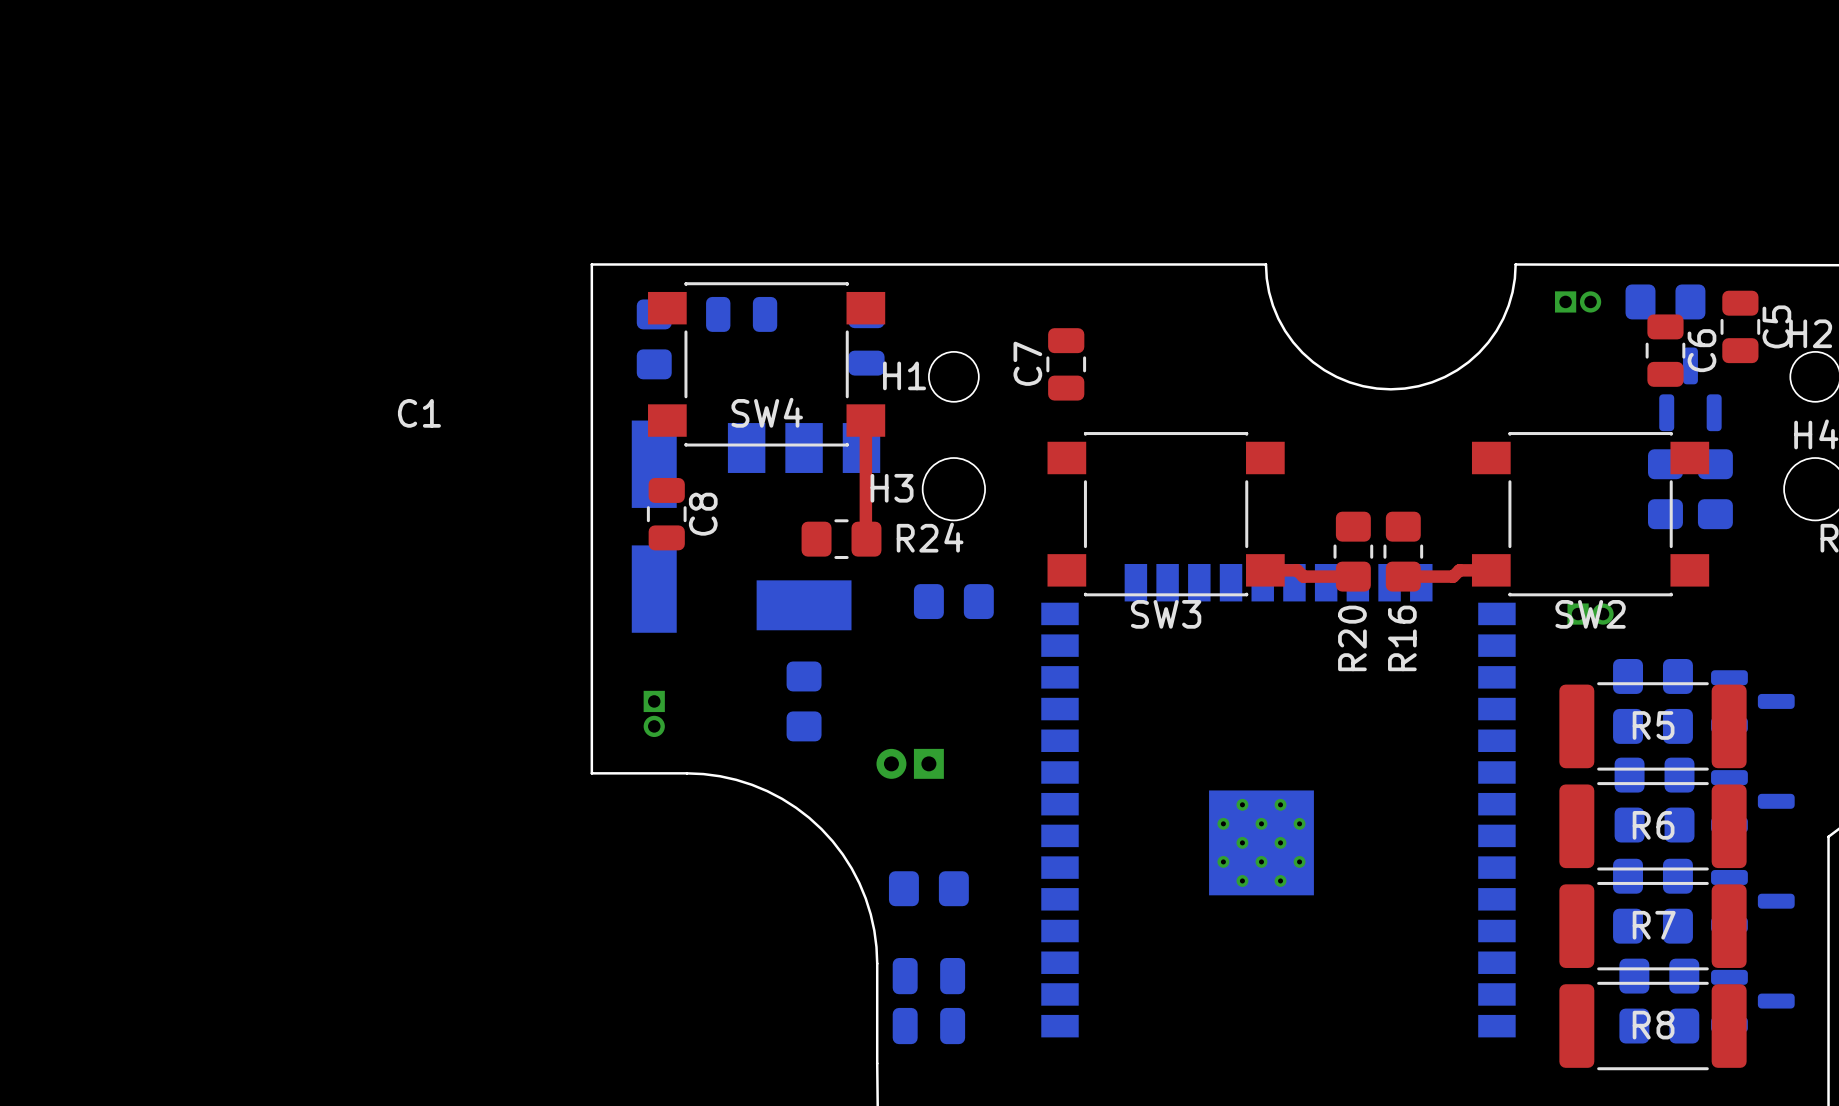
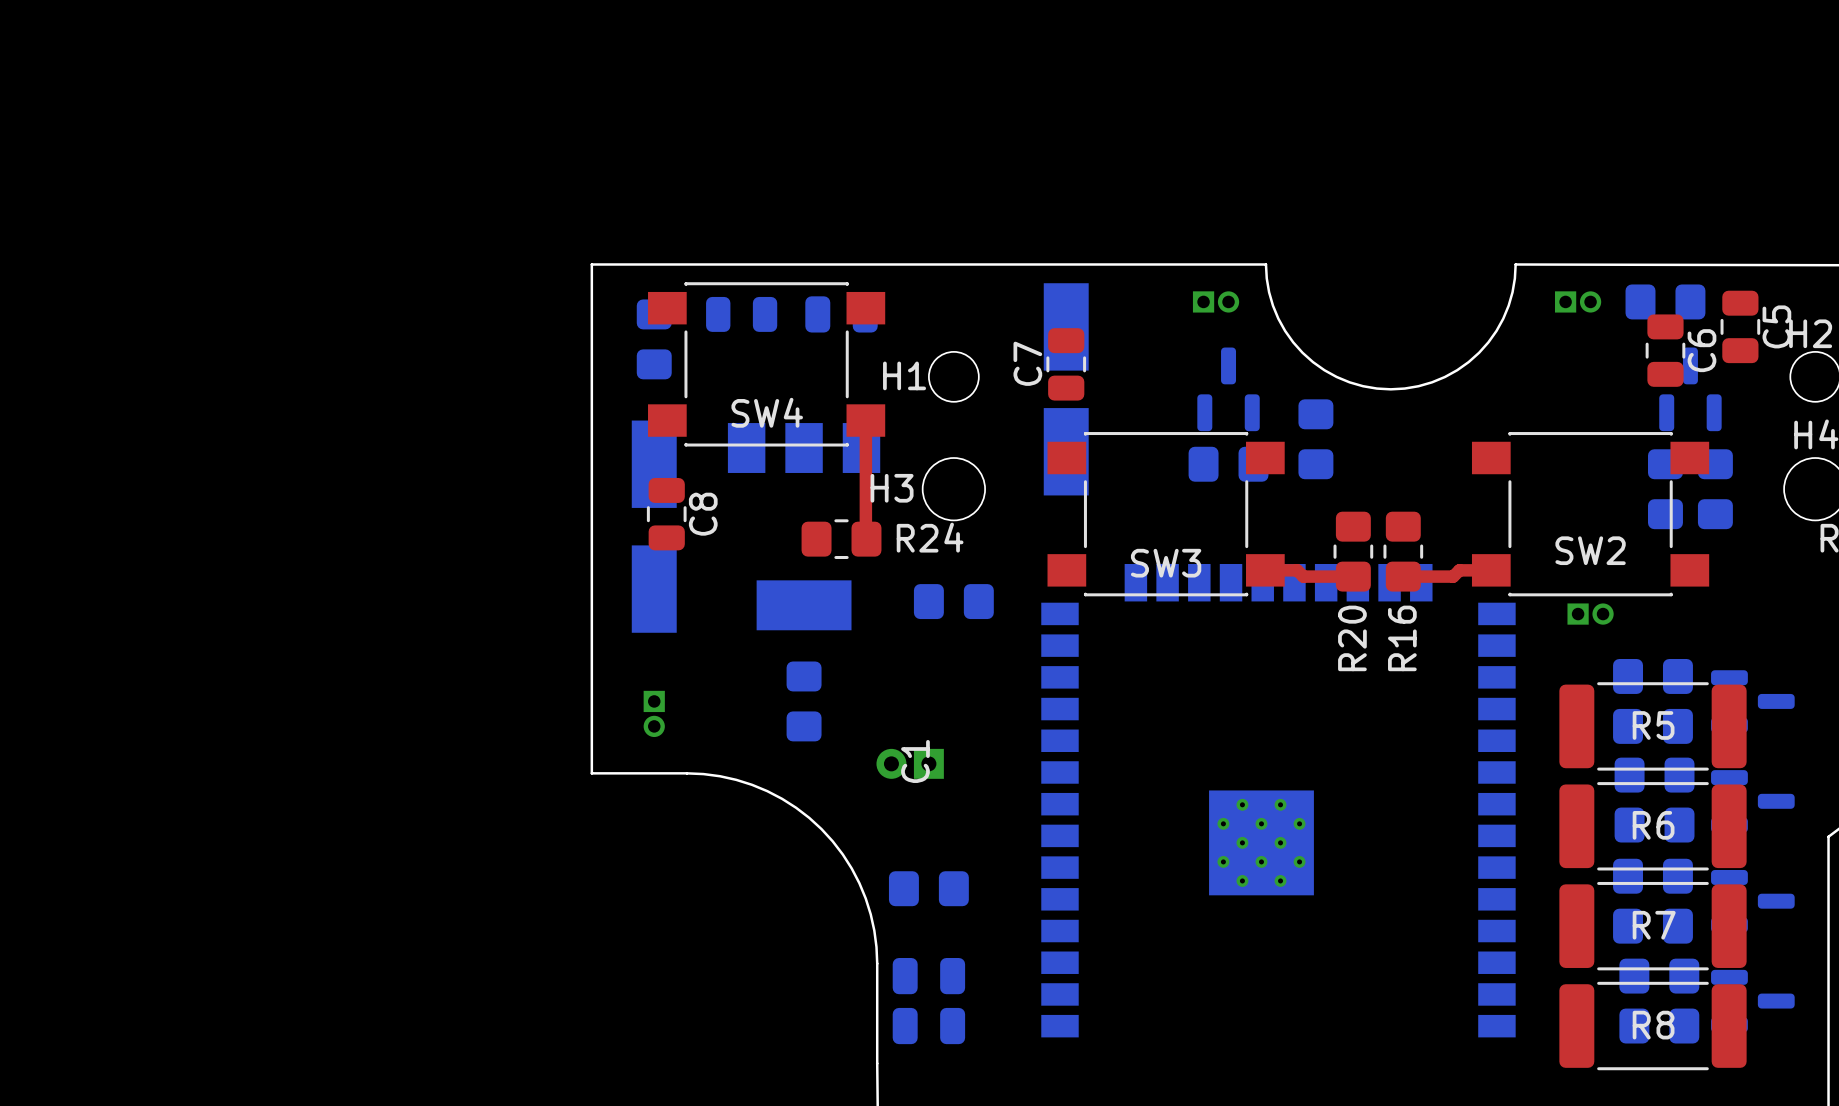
part: none -> (1216, 301)
C1 rotation: 0° (866, 339) -> 90° clockwise (841, 314)
part: none -> (1066, 389)
part: none -> (1228, 389)
C1 name position: C1 (419, 413) -> C1 (915, 761)
part: none -> (1315, 439)
part: none -> (1228, 464)
SW3 name position: SW3 (1166, 614) -> SW3 (1166, 563)
SW2 name position: SW2 (1590, 614) -> SW2 (1590, 550)

